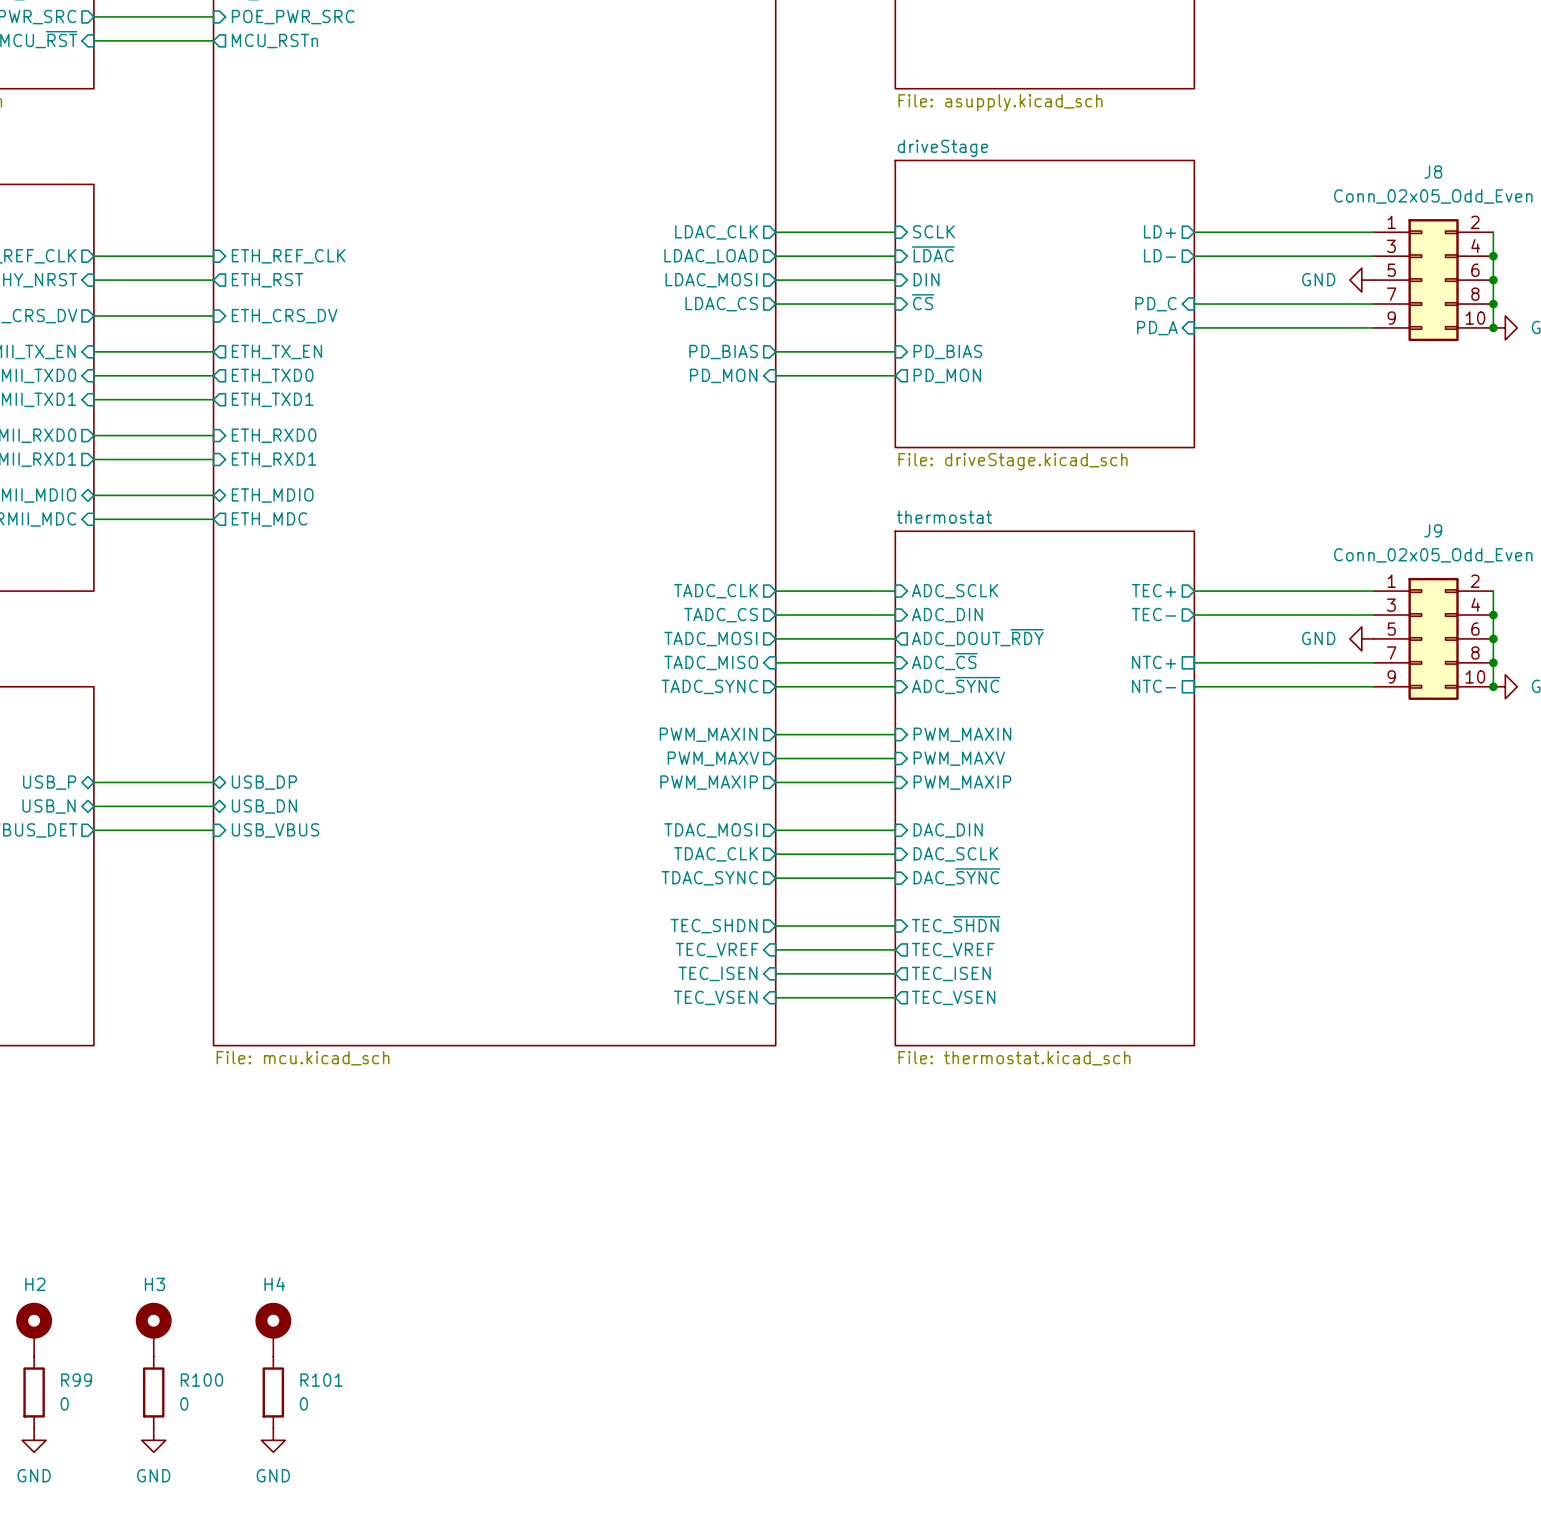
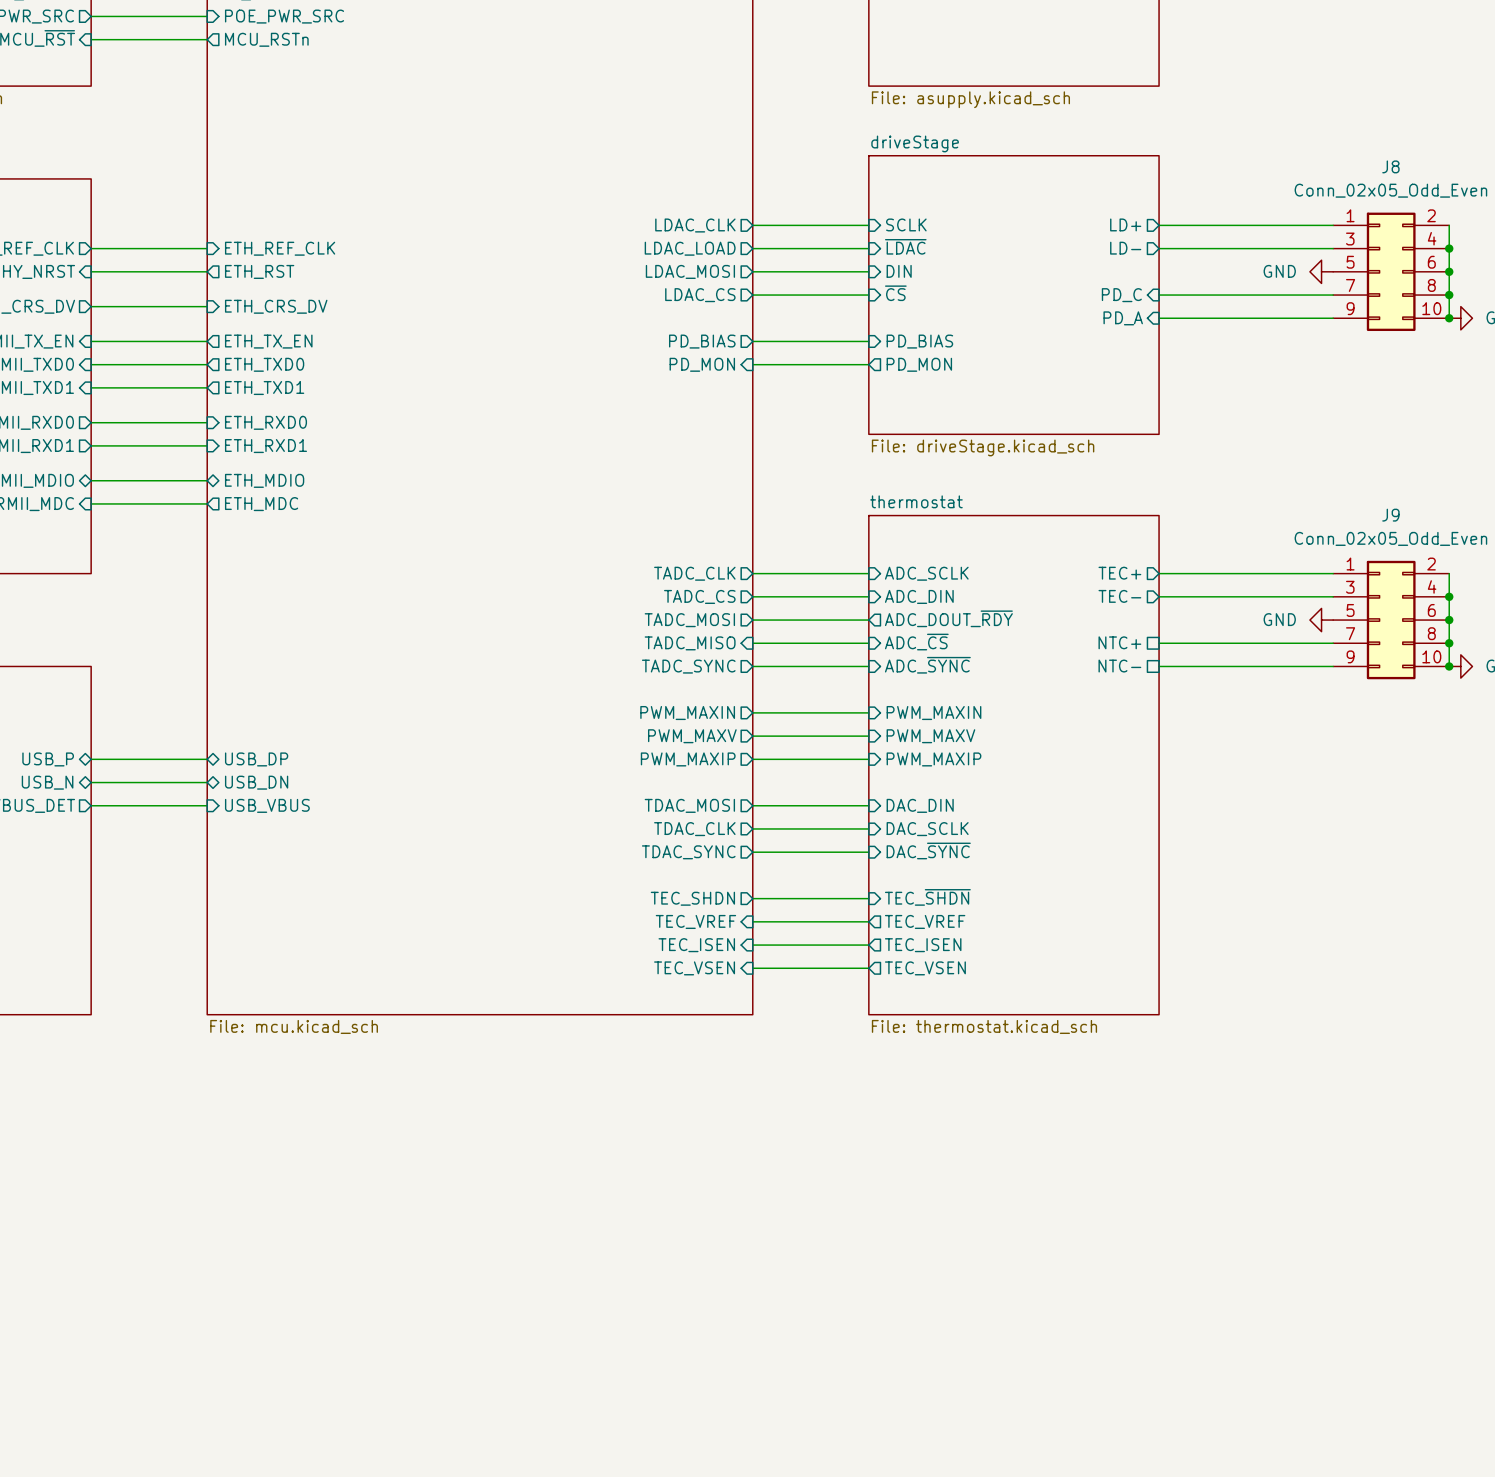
H2: (34, 1329) -> none
H3: (153, 1329) -> none
H4: (273, 1329) -> none
R99: 0 (34, 1392) -> none
R100: 0 (153, 1392) -> none
R101: 0 (273, 1392) -> none
power symbol: GND (34, 1440) -> none
power symbol: GND (153, 1440) -> none
power symbol: GND (273, 1440) -> none

